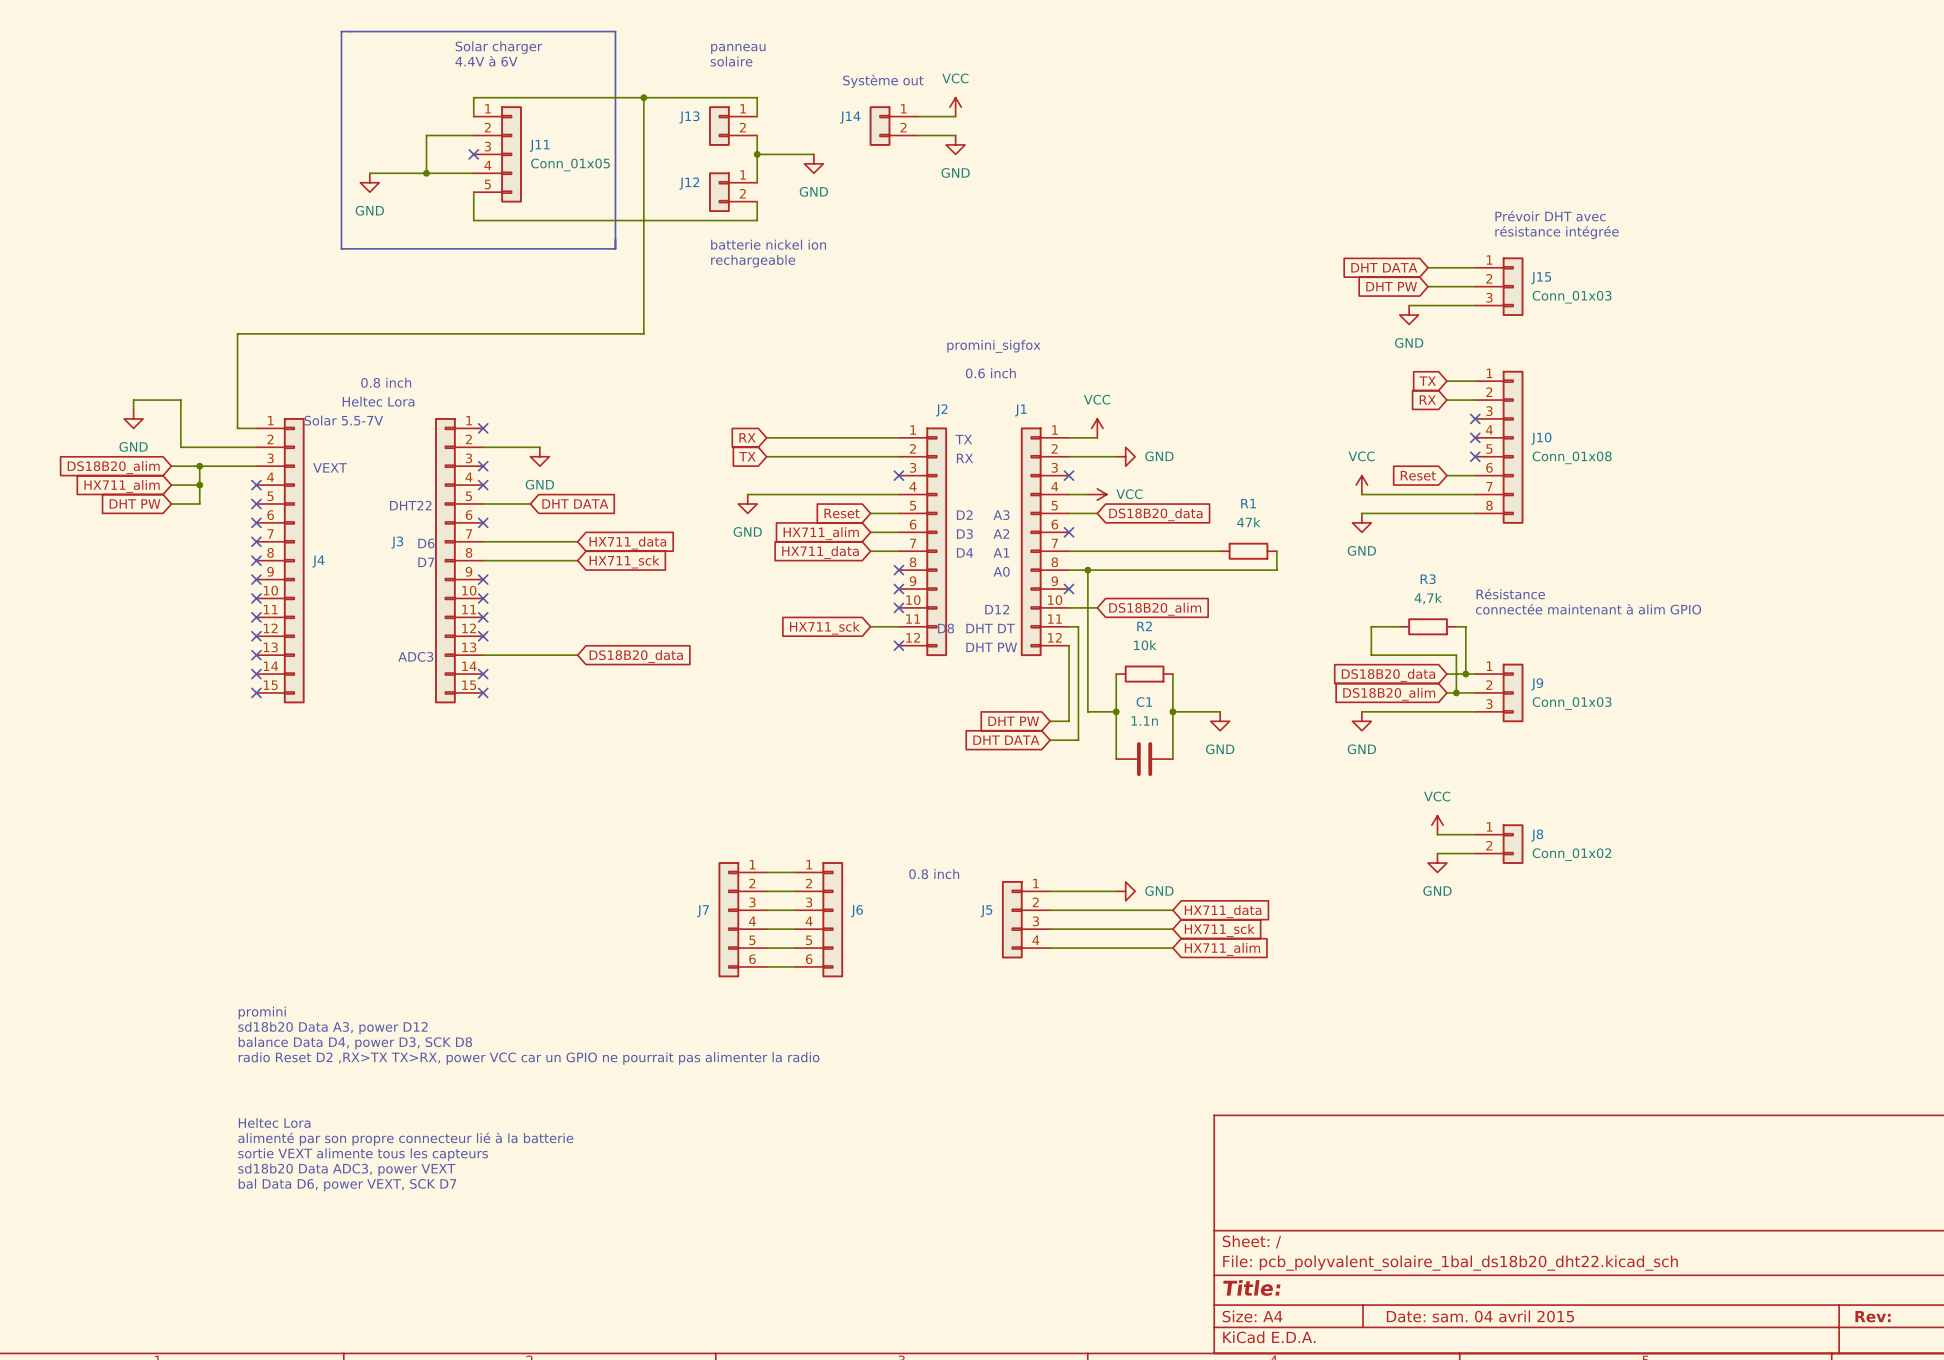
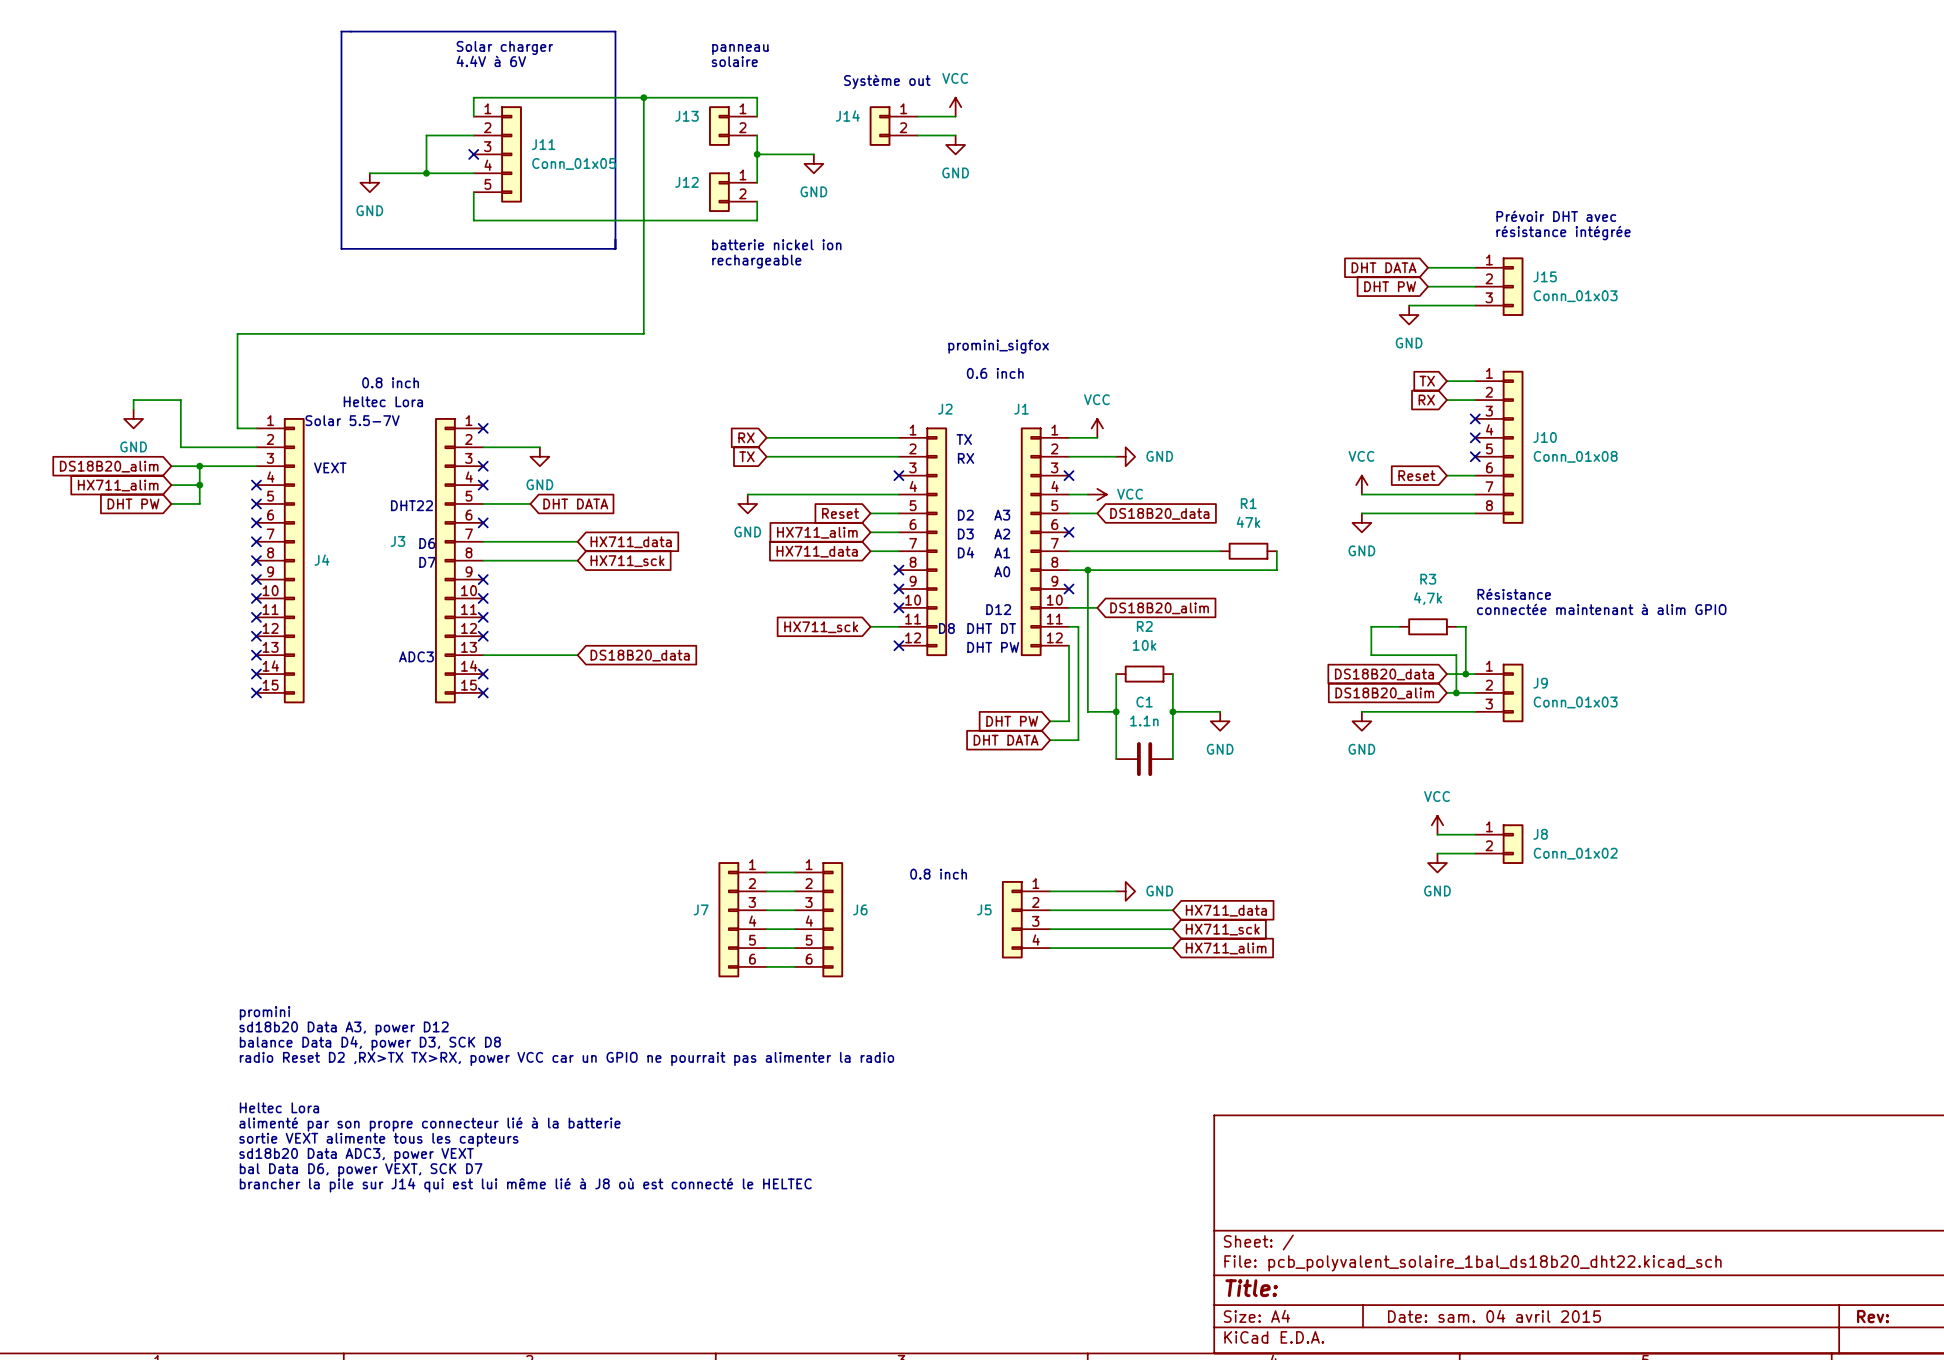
text: none -> Heltec Lora (279, 1107)
text: Heltec Lora (274, 1122) -> alimenté par son propre connecteur lié à la batterie (429, 1124)
text: alimenté par son propre connecteur lié à la batterie (405, 1139) -> sortie VEXT alimente tous les capteurs (378, 1139)
text: sortie VEXT alimente tous les capteurs (363, 1154) -> sd18b20 Data ADC3, power VEXT (356, 1155)
text: sd18b20 Data ADC3, power VEXT (346, 1169) -> bal Data D6, power VEXT, SCK D7 (361, 1170)
text: bal Data D6, power VEXT, SCK D7 (347, 1185) -> brancher la pile sur J14 qui est lui même lié à J8 où est connecté le HELTEC (525, 1185)

